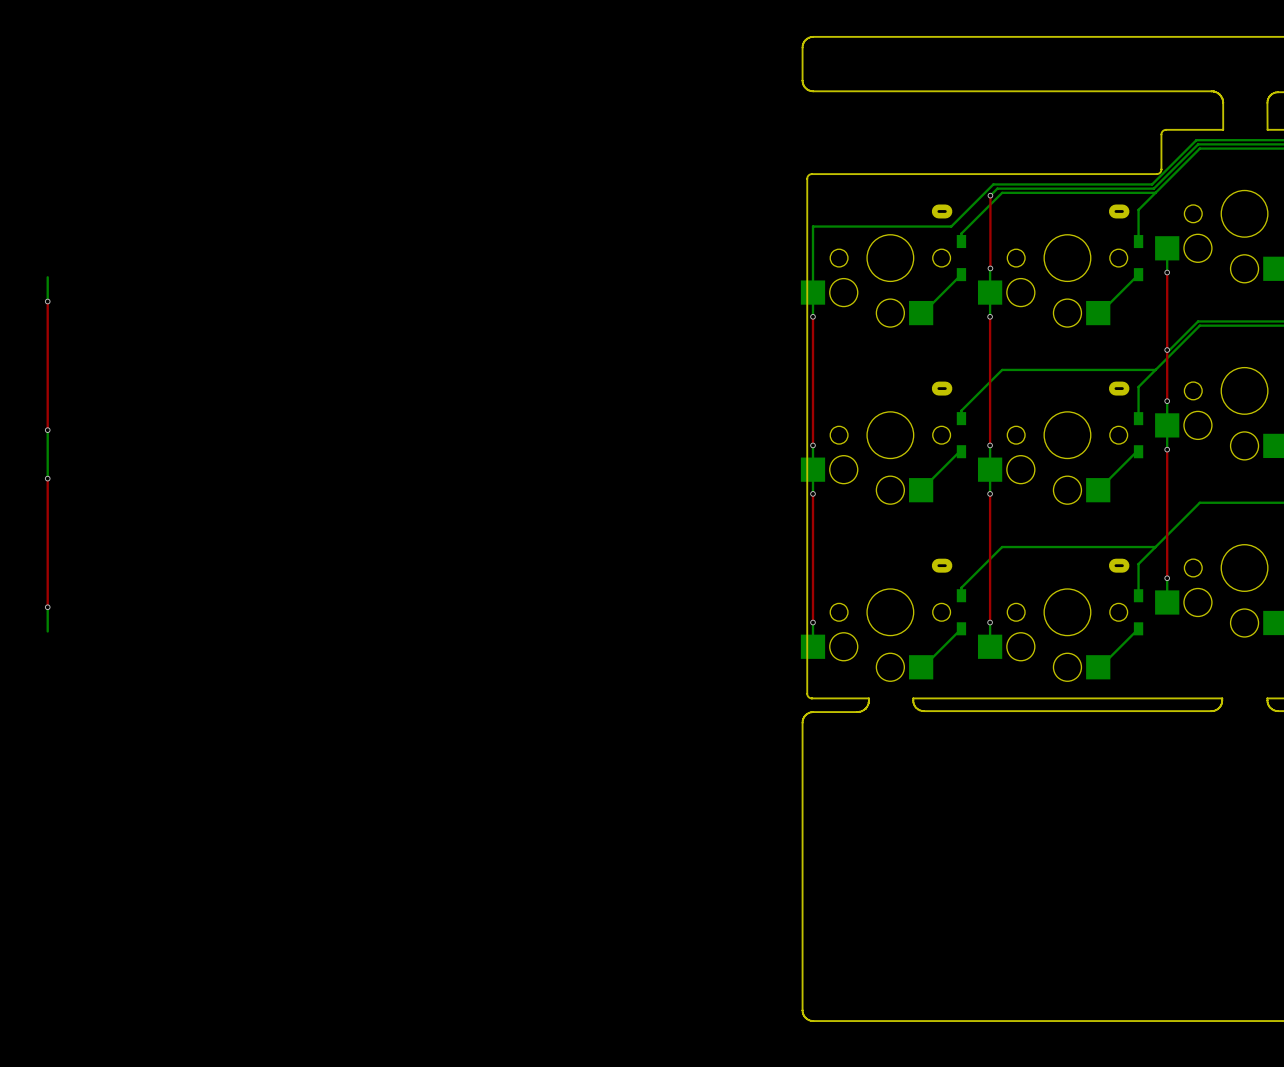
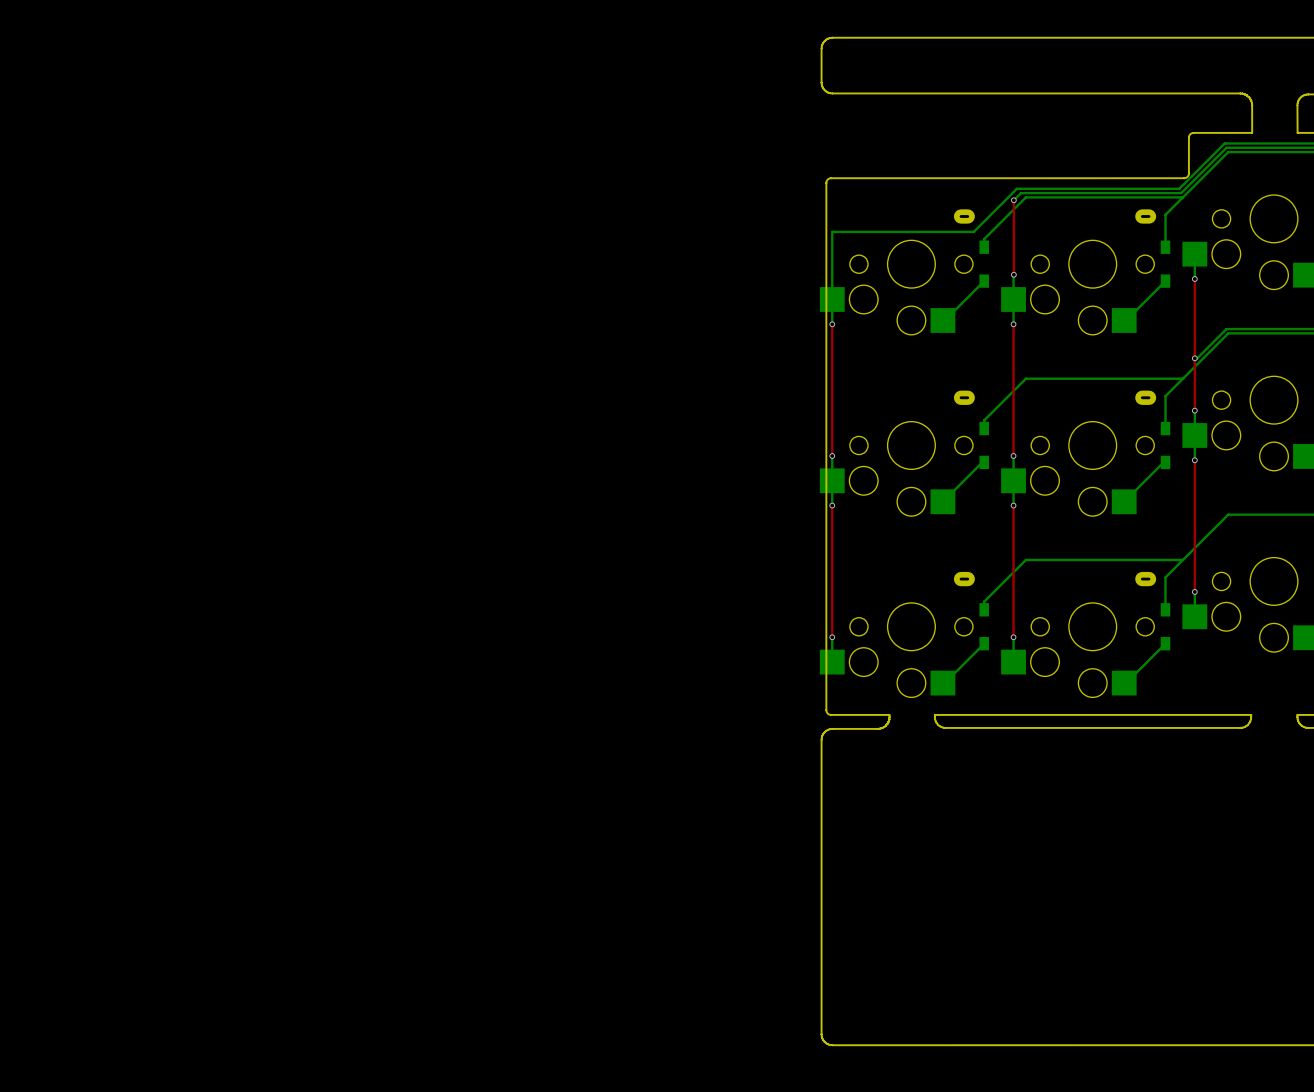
bottom track: (47, 277) (47, 301) -> none
top track: (47, 301) (47, 430) -> none
via: (47, 301) -> none
bottom track: (47, 430) (47, 478) -> none
via: (47, 430) -> none
top track: (47, 478) (47, 607) -> none
via: (47, 478) -> none
bottom track: (47, 607) (47, 631) -> none
via: (47, 607) -> none

